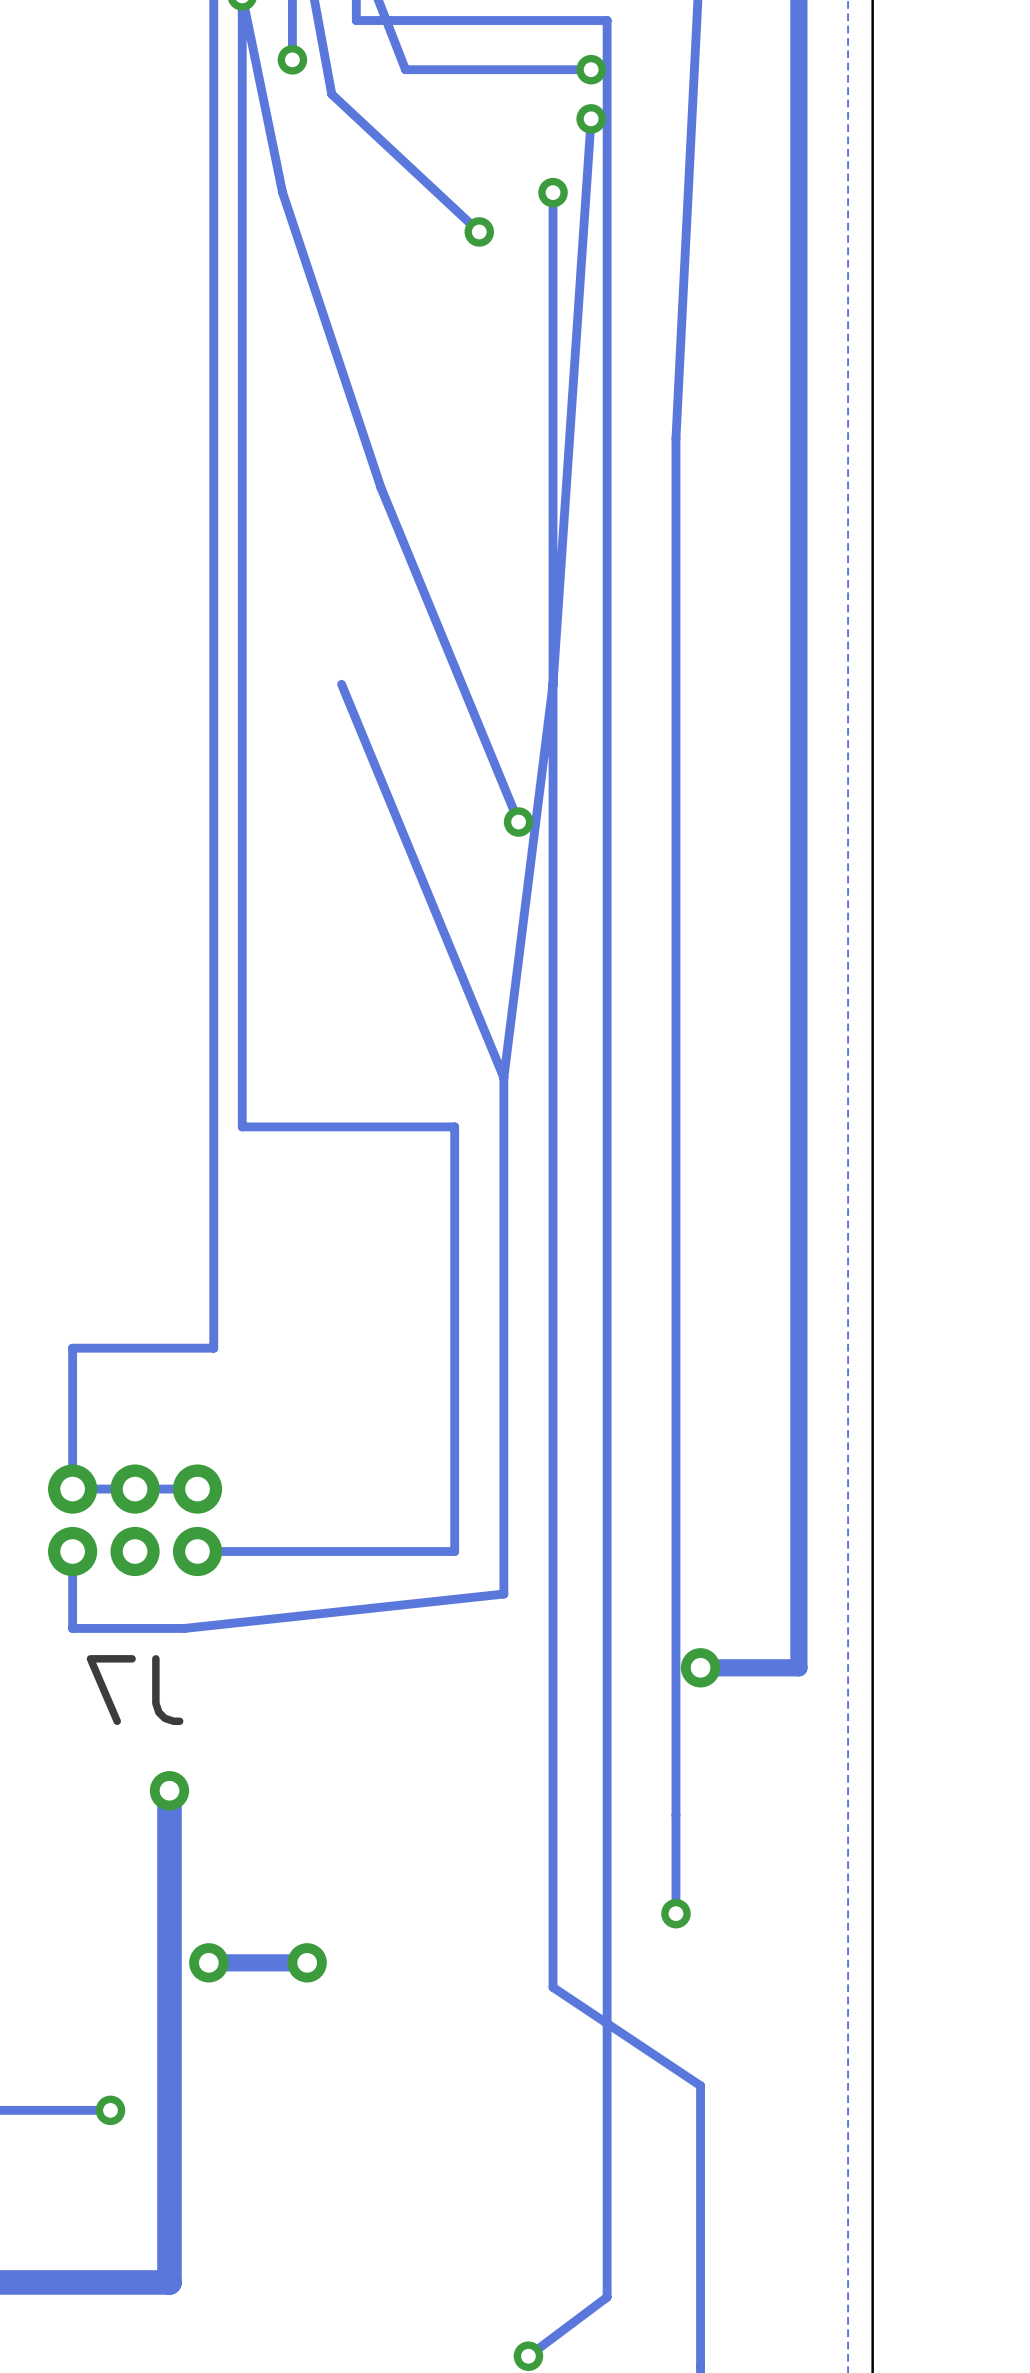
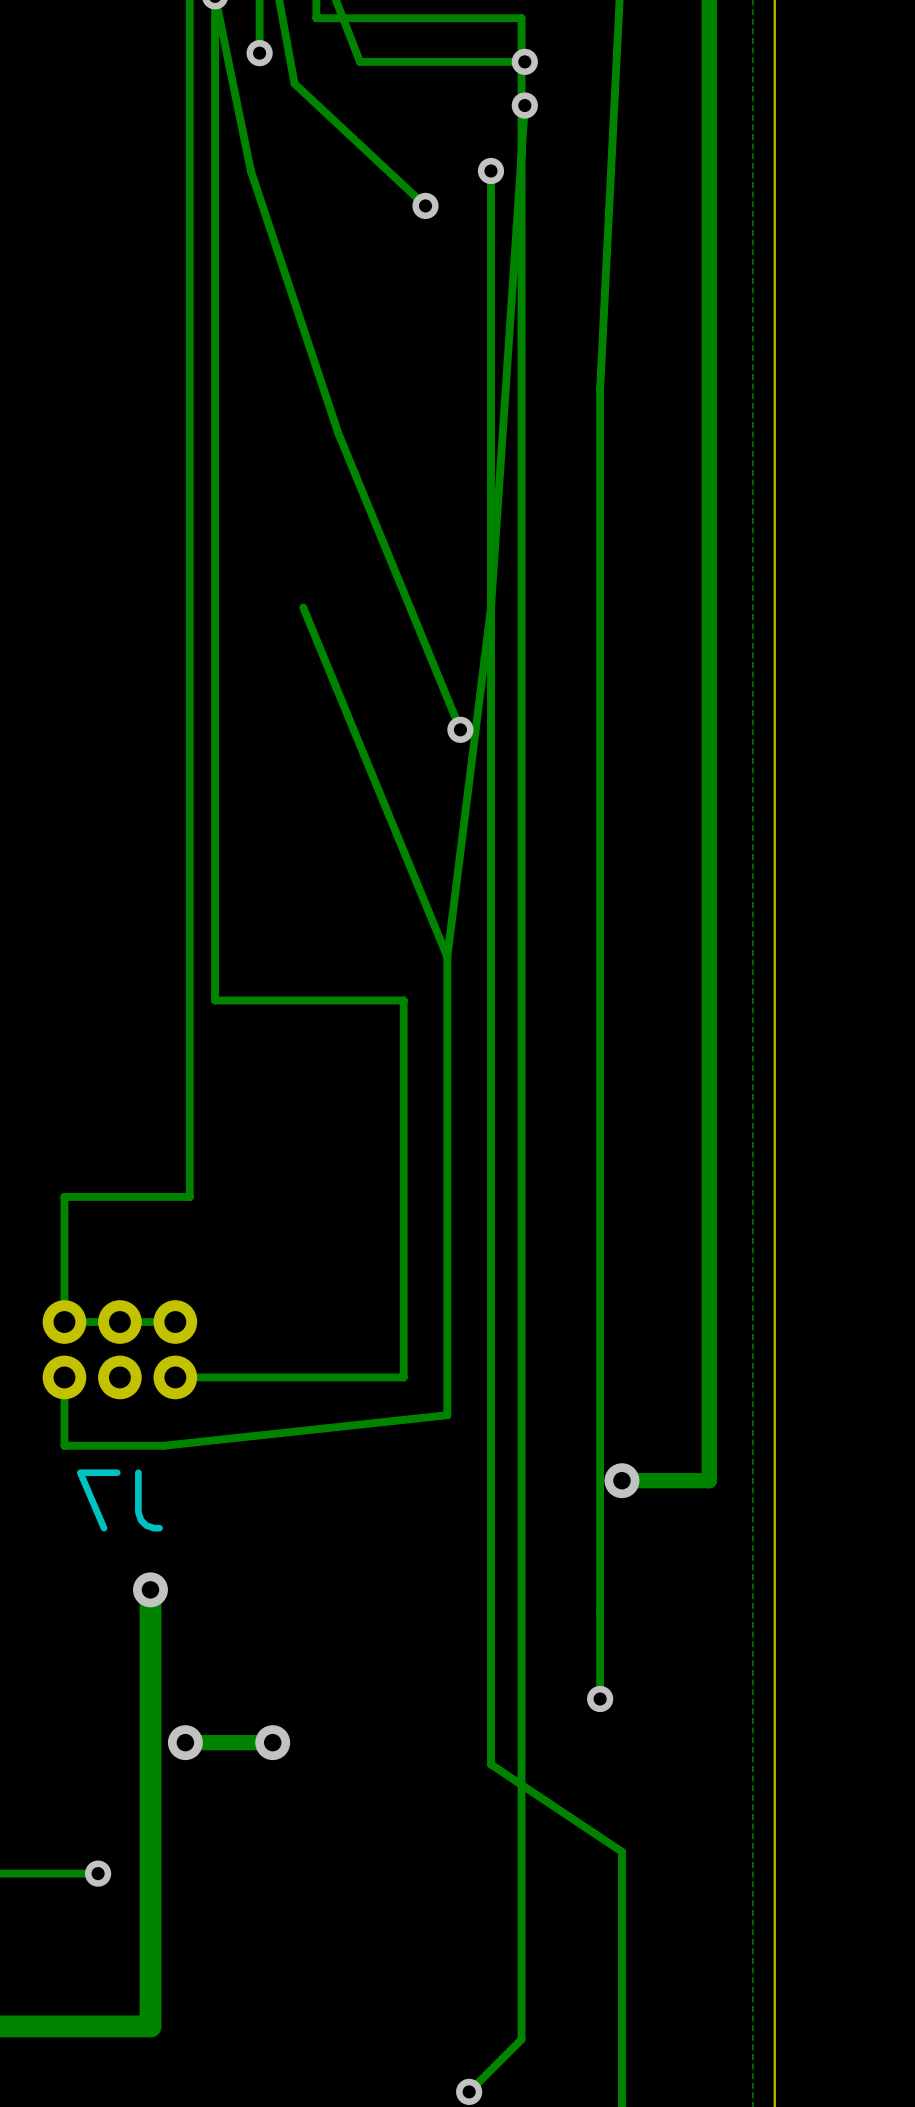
track: (587, 20) (607, 20) (607, 2297) (528, 2356) -> (521, 18) (521, 2039) (469, 2091)

